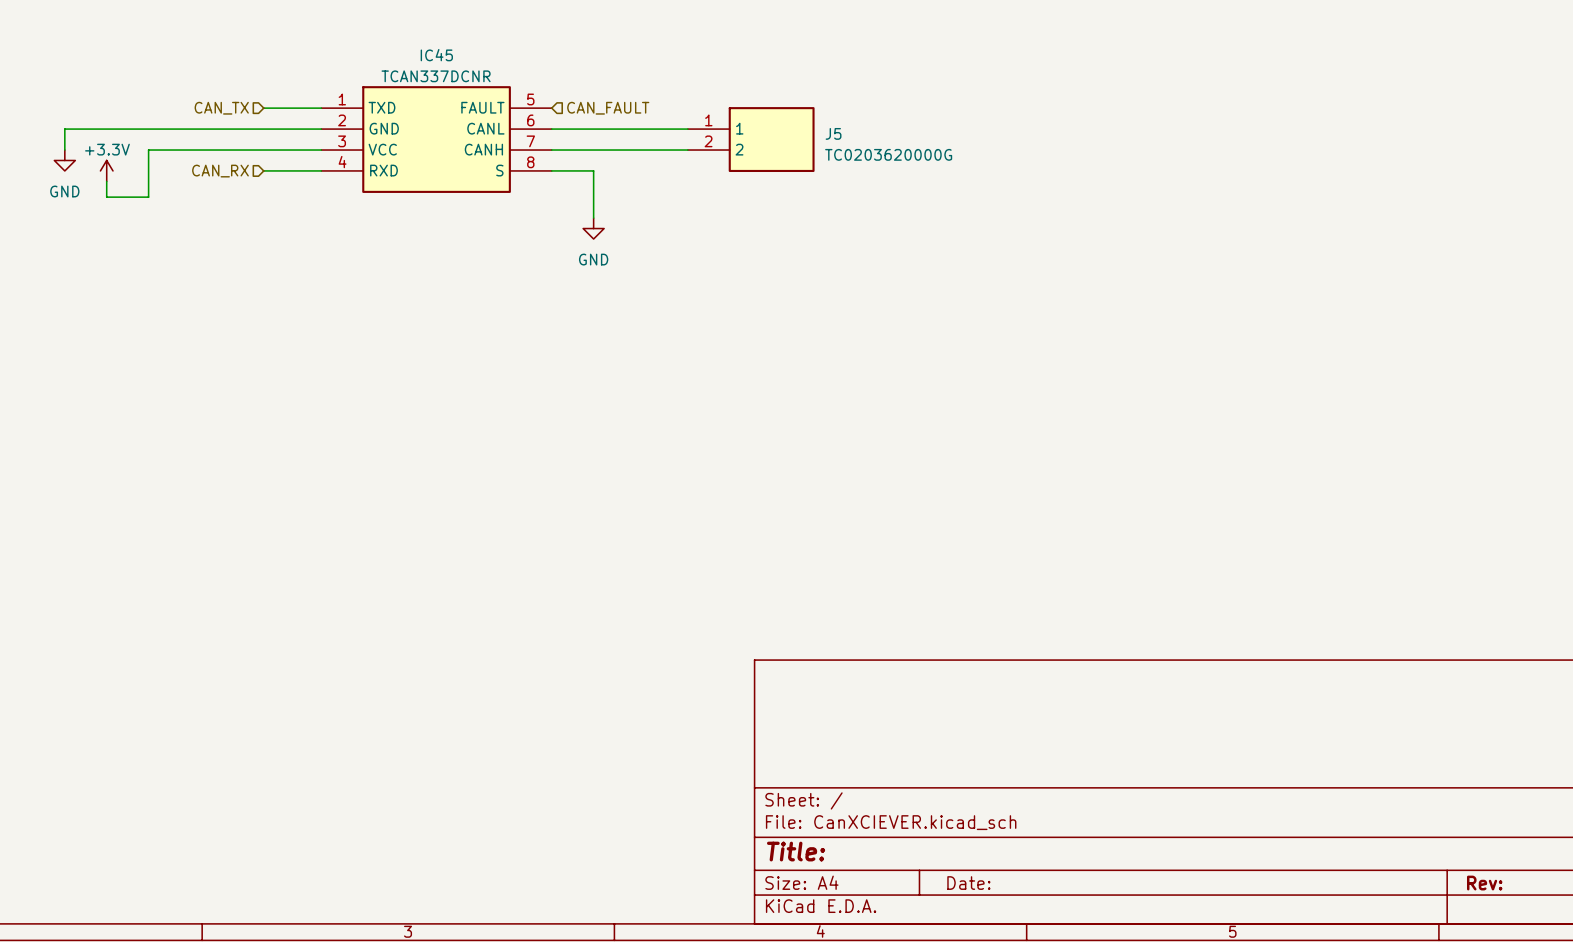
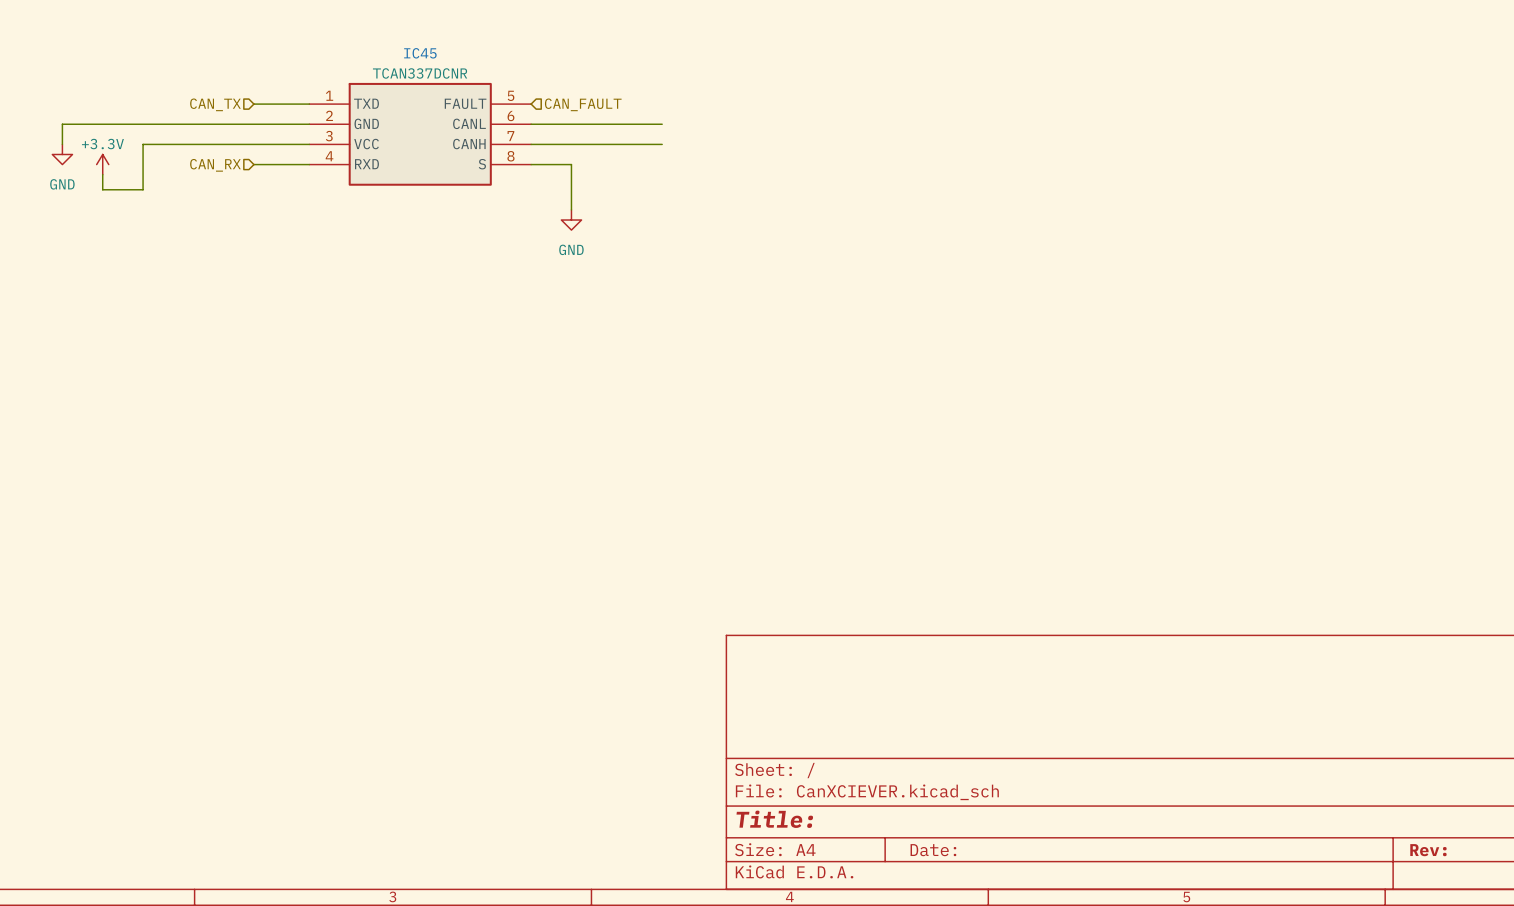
J5: TC0203620000G (751, 139) -> none

